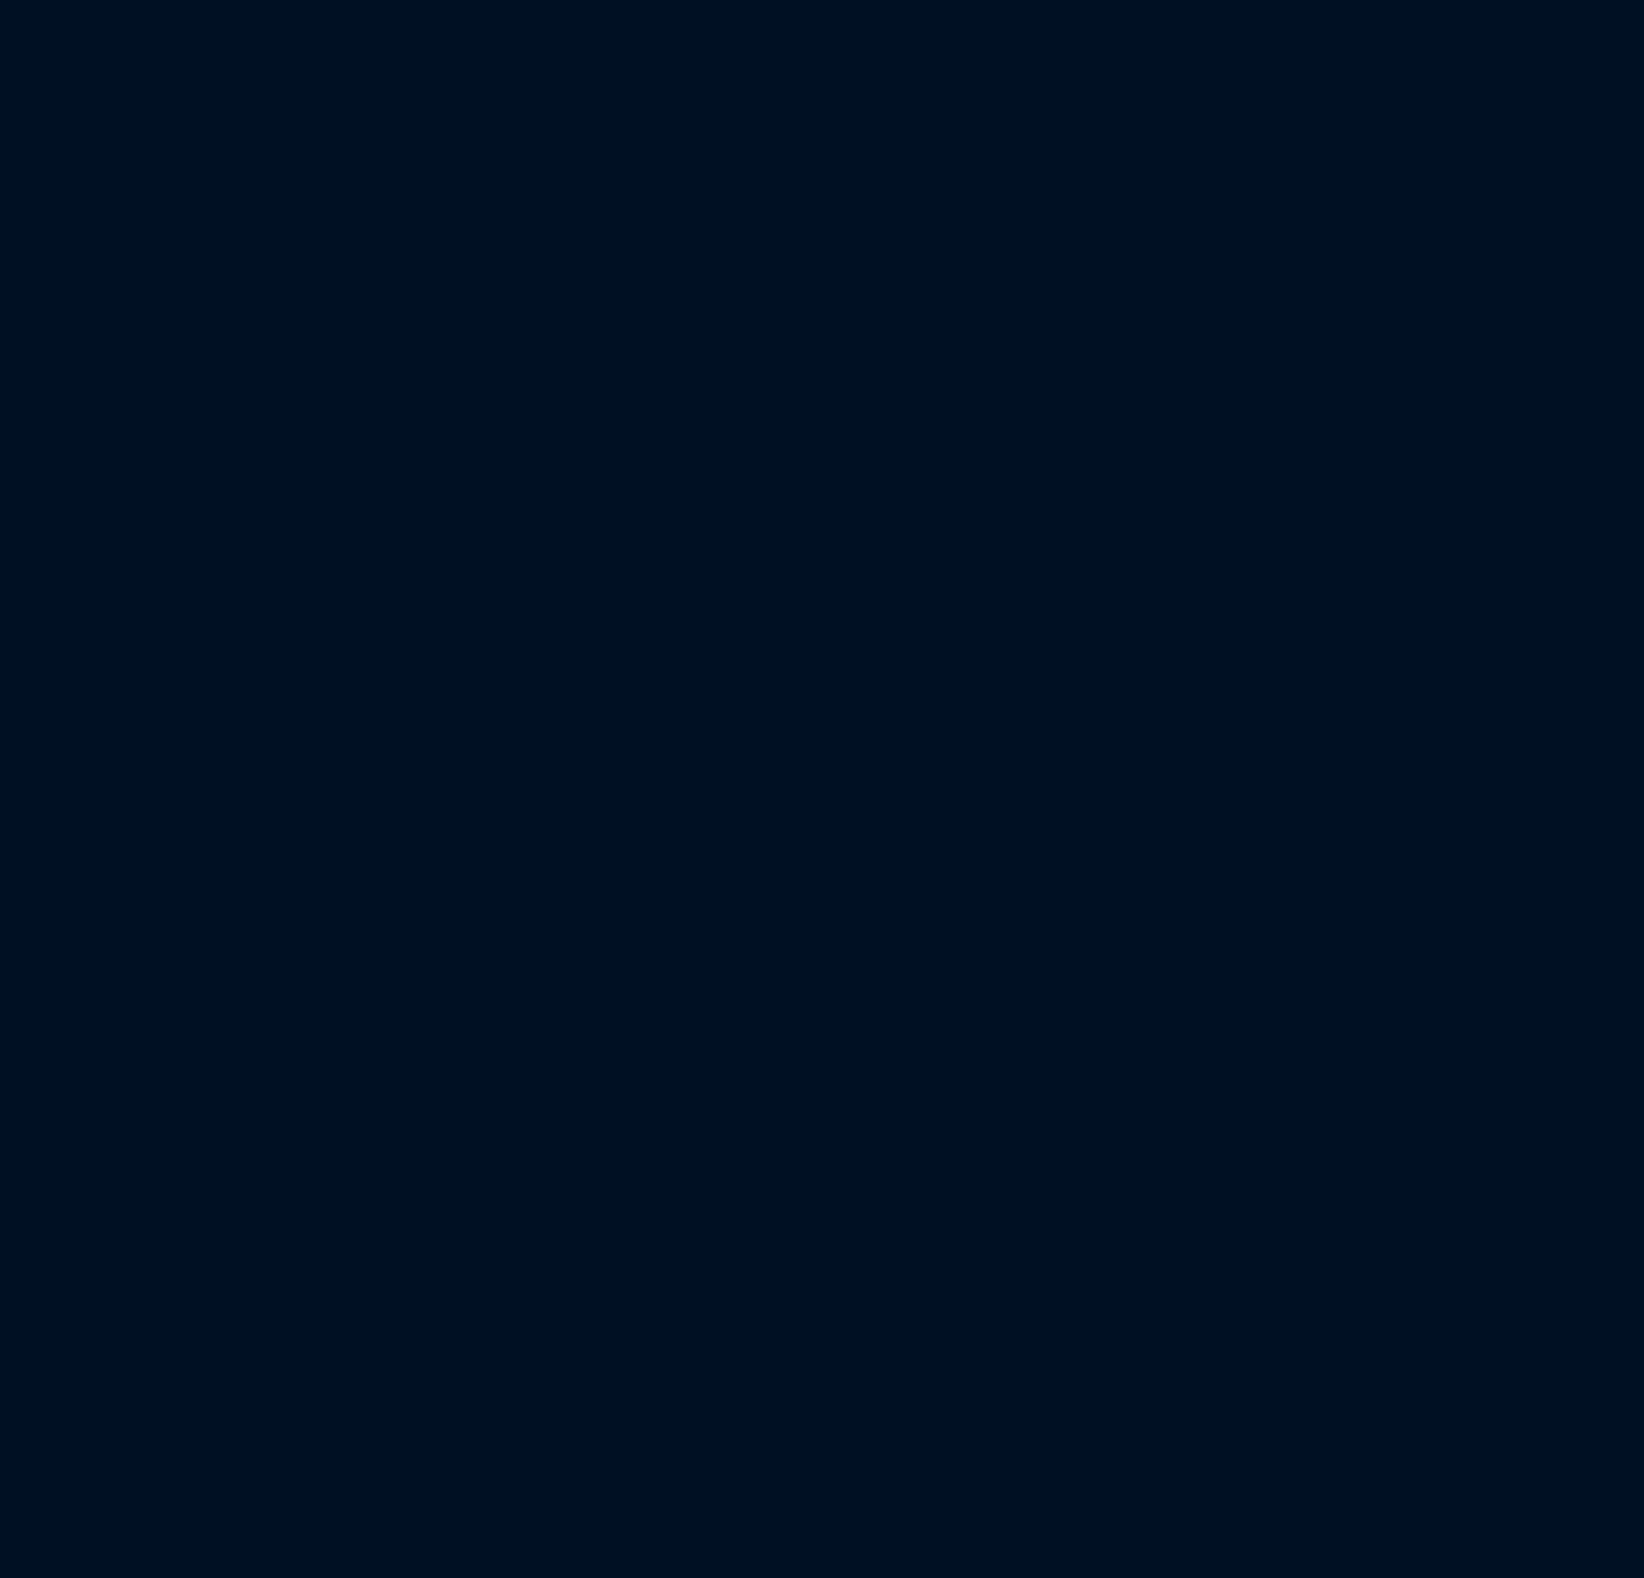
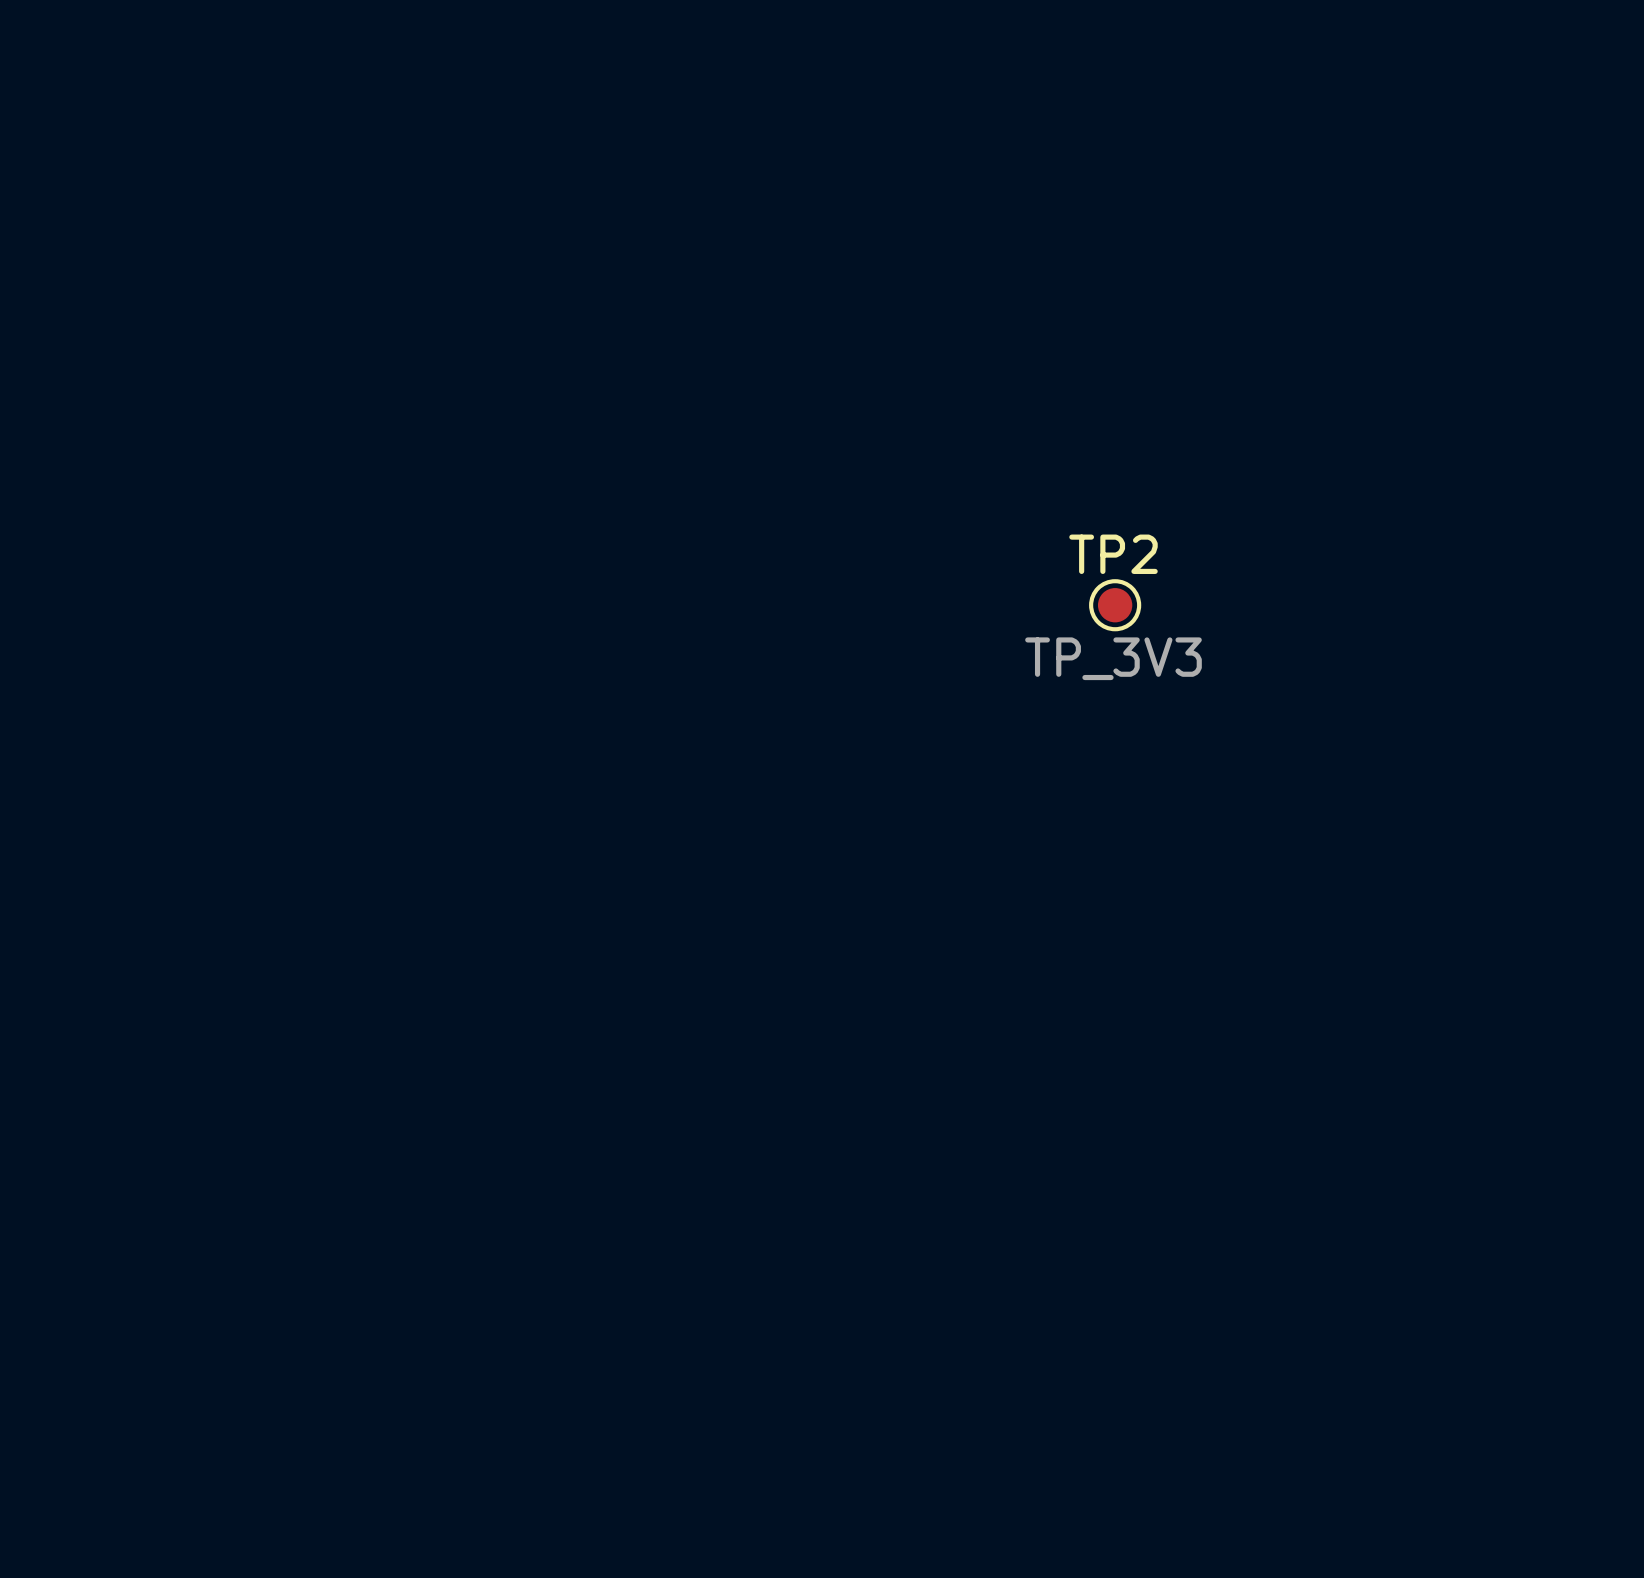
TP2: none -> TP_3V3 (1115, 605)

